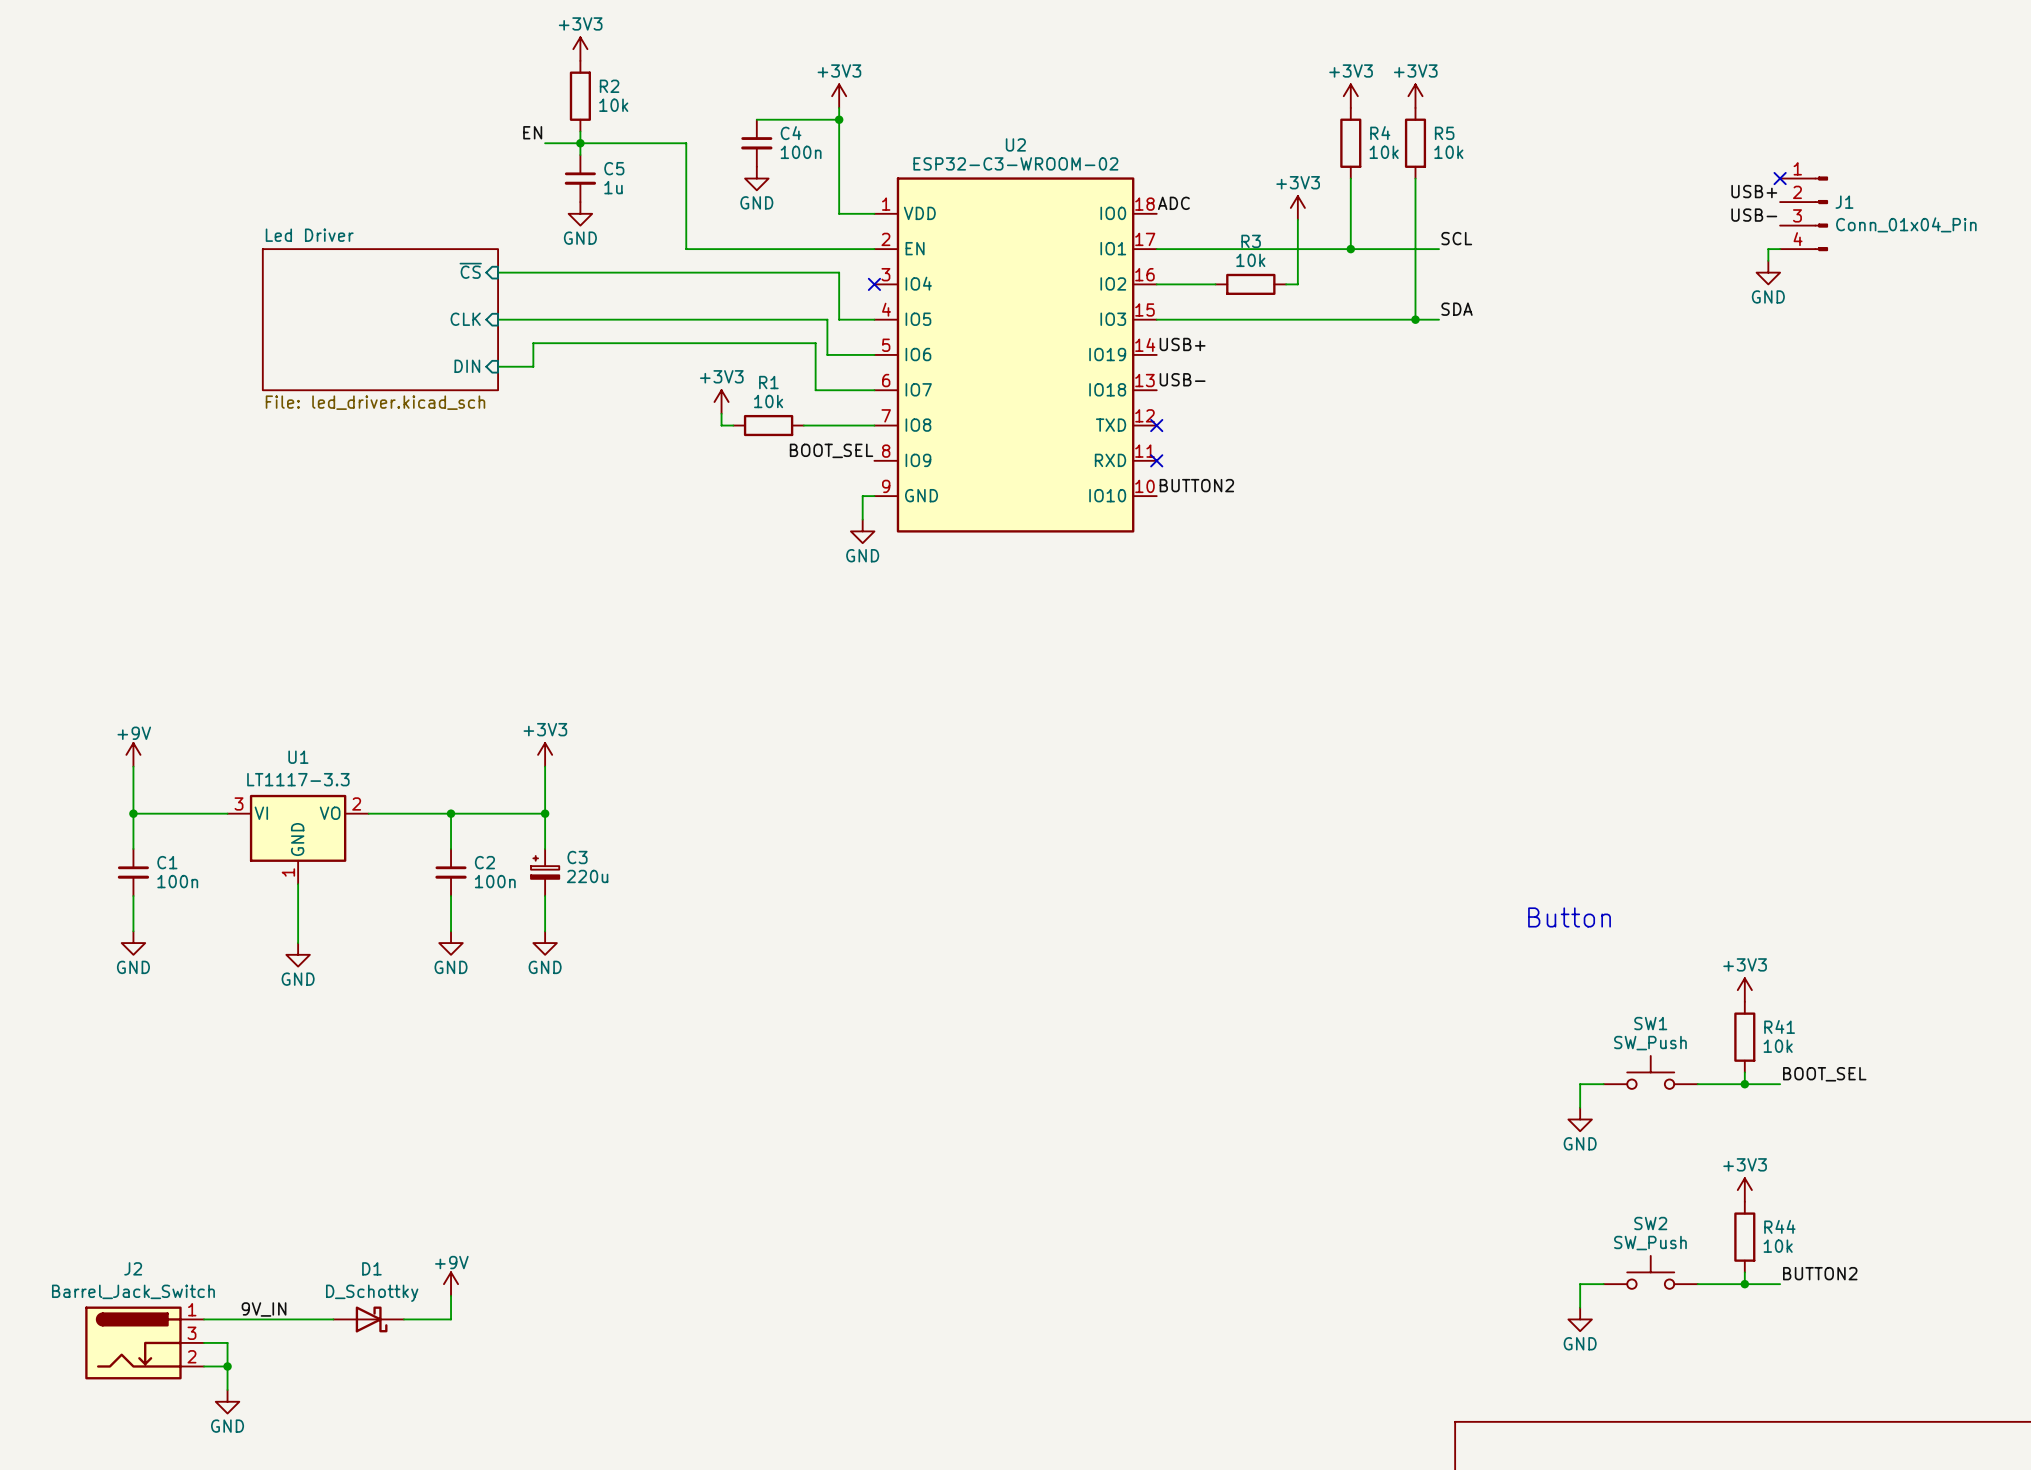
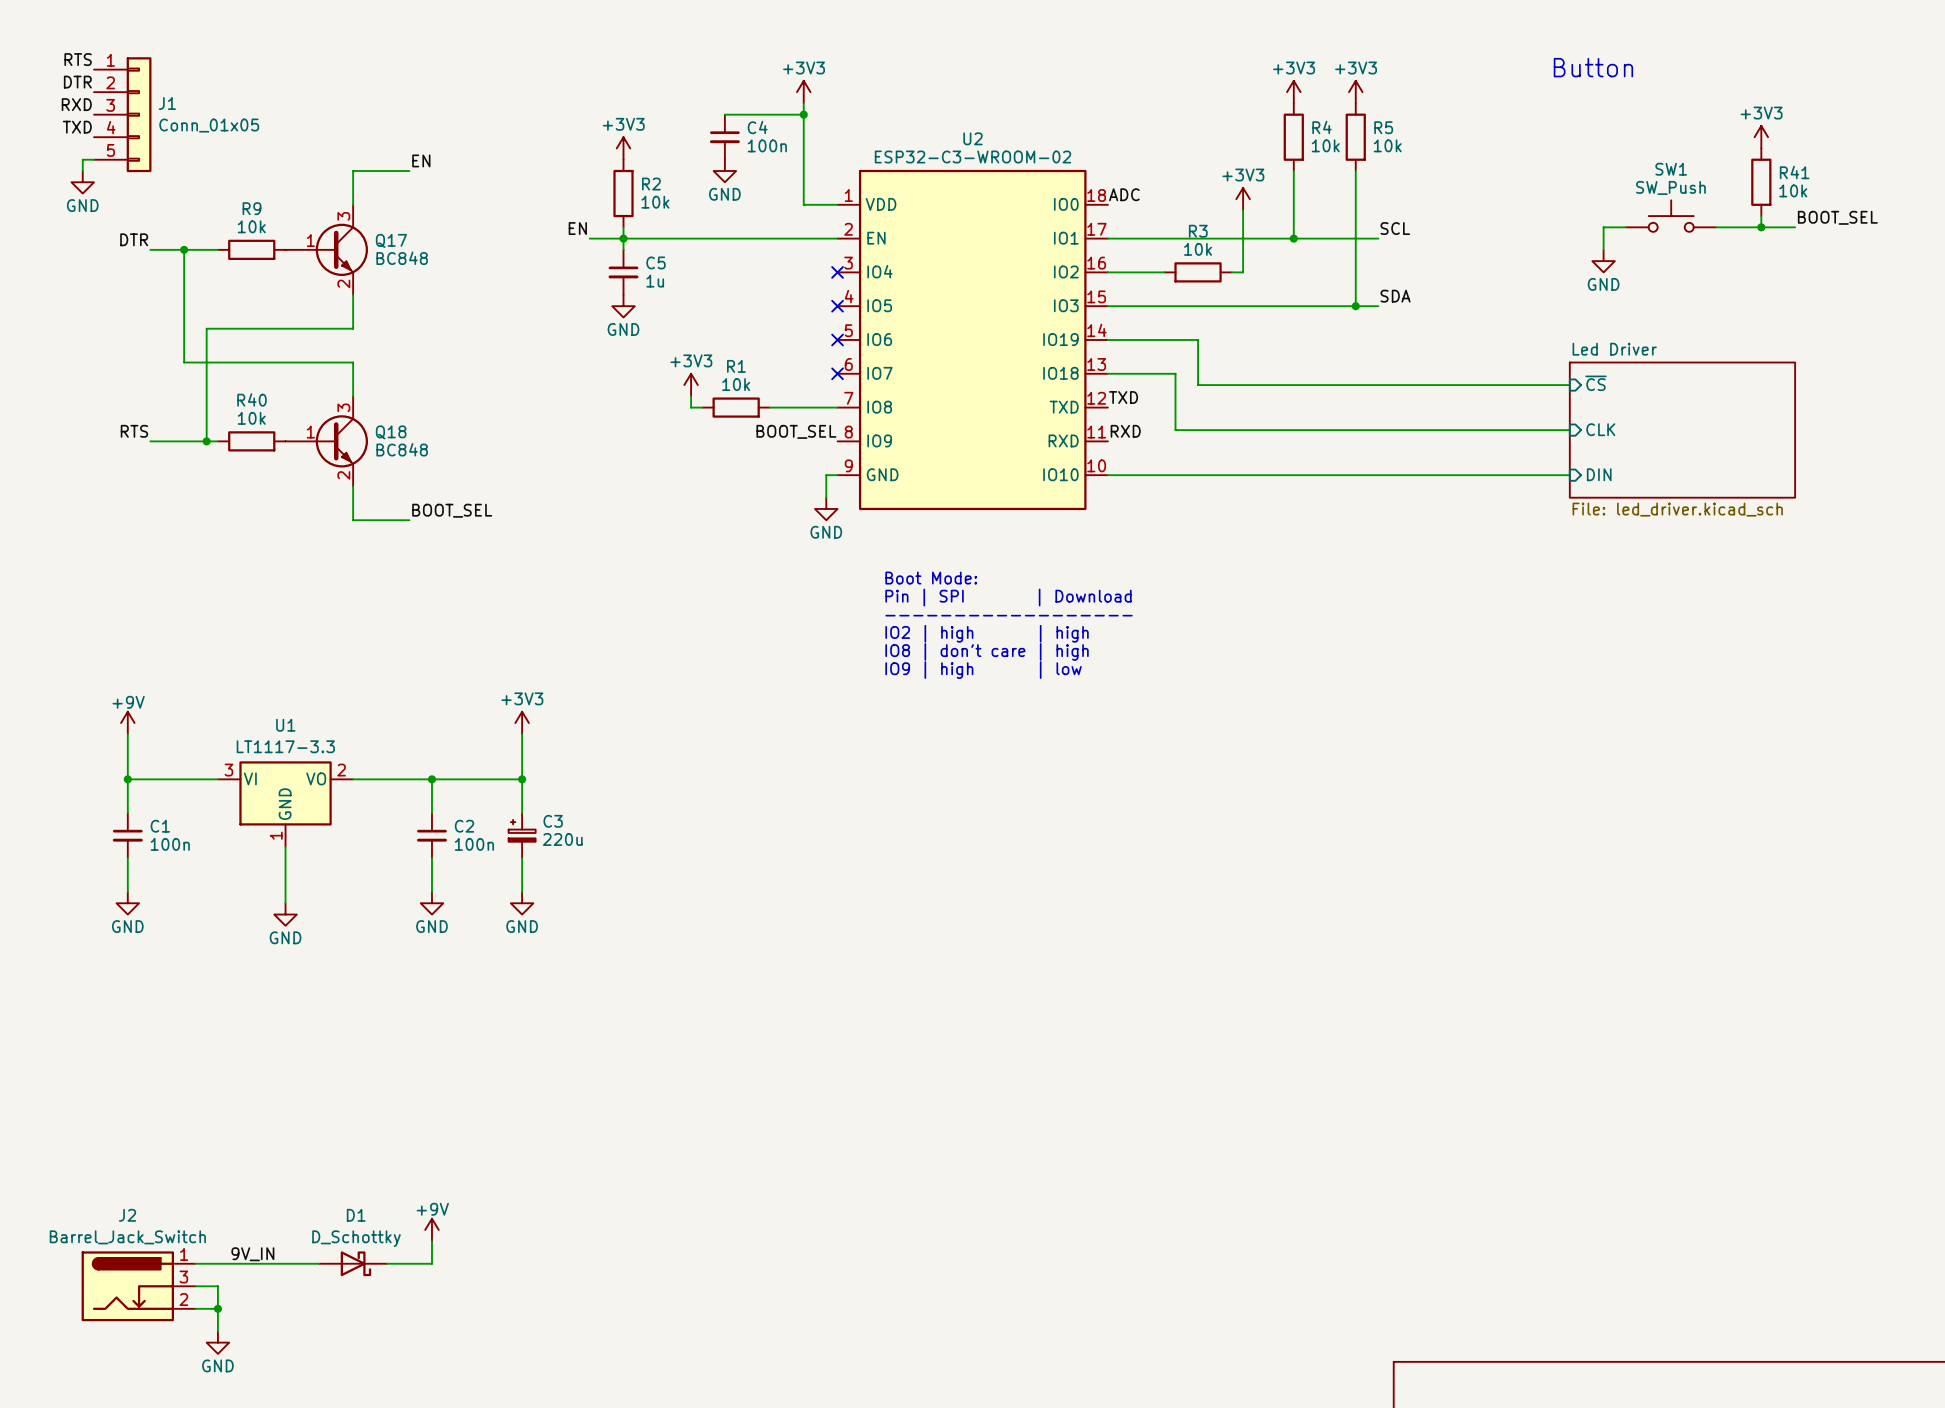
power symbol position: +3V3 (580, 49) -> +3V3 (623, 148)
label: none -> RTS (78, 59)
text: none -> Button (1593, 67)
label: none -> DTR (77, 82)
R2 position: (580, 96) -> (623, 193)
label: none -> RXD (76, 104)
wire: (580, 131) (580, 155) -> (623, 227) (623, 249)
label: none -> TXD (77, 127)
label: EN (532, 132) -> none
wire: (545, 143) (686, 143) (686, 249) -> (589, 238) (657, 238)
junction: (580, 143) -> none
power symbol: none -> +3V3 (1761, 137)
wire: none -> (94, 159) (82, 159) (82, 171)
label: none -> EN (421, 160)
J1 symbol: [1780, 176, 1828, 251] -> [94, 57, 152, 173]
wire: none -> (409, 171) (353, 171) (353, 204)
C5 position: (580, 178) -> (623, 272)
no-connect mark: (1780, 178) -> none
power symbol: none -> GND (82, 182)
label: USB+ (1754, 191) -> none
power symbol position: GND (580, 213) -> GND (623, 306)
label: USB- (1754, 215) -> none
J1 value: Conn_01x04_Pin (1906, 224) -> Conn_01x05 (209, 125)
wire: none -> (1761, 216) (1761, 227)
label: none -> BOOT_SEL (1837, 217)
wire: none -> (1626, 227) (1603, 227) (1603, 249)
wire: none -> (1716, 227) (1795, 227)
junction: none -> (1761, 227)
label: none -> EN (577, 228)
junction: none -> (623, 238)
wire: (1780, 249) (1768, 249) (1768, 260) -> none
label: none -> DTR (134, 239)
wire: none -> (150, 249) (217, 249)
wire: none -> (184, 249) (184, 362) (353, 362) (353, 396)
junction: none -> (184, 249)
R9: none -> 10k (251, 249)
Q17: none -> BC848 (326, 249)
sheet pin: ~{CS} (470, 270) -> none
wire: (498, 272) (839, 272) (839, 319) (874, 319) -> none
power symbol position: GND (1768, 272) -> GND (1603, 261)
wire: none -> (353, 294) (353, 328) (206, 328) (206, 441)
sheet Led Driver: File: led_driver.kicad_sch (380, 319) -> none
sheet pin: CLK (465, 319) -> none
wire: (498, 319) (827, 319) (827, 354) (874, 354) -> none
no-connect mark: none -> (837, 306)
label: USB+ (1182, 344) -> none
no-connect mark: none -> (837, 339)
wire: none -> (1107, 339) (1198, 339) (1198, 385) (1569, 385)
sheet pin: DIN (467, 366) -> none
wire: (498, 366) (533, 366) (533, 343) (815, 343) (815, 390) (874, 390) -> none
label: USB- (1182, 379) -> none
no-connect mark: none -> (837, 373)
wire: none -> (1107, 373) (1175, 373) (1175, 430) (1569, 430)
sheet pin: none -> ~{CS} (1596, 383)
label: none -> TXD (1123, 397)
no-connect mark: (1156, 425) -> none
sheet pin: none -> CLK (1600, 429)
sheet Led Driver: none -> File: led_driver.kicad_sch (1682, 430)
label: none -> RTS (134, 431)
label: none -> RXD (1125, 431)
wire: none -> (150, 441) (217, 441)
junction: none -> (206, 441)
R40: none -> 10k (251, 441)
Q18: none -> BC848 (326, 441)
no-connect mark: (1156, 460) -> none
label: BUTTON2 (1196, 485) -> none
sheet pin: none -> DIN (1599, 474)
wire: none -> (1107, 475) (1569, 475)
wire: none -> (353, 486) (353, 520) (409, 520)
label: none -> BOOT_SEL (452, 510)
text: none -> Boot Mode: (931, 578)
text: none -> Pin | SPI | Download (1008, 597)
text: none -> ------------------ (1009, 615)
text: none -> IO2 | high | high (987, 633)
text: none -> IO8 | don't care | high (987, 651)
text: none -> IO9 | high | low (983, 670)
text: Button (1569, 917) -> none
power symbol: +3V3 (1744, 990) -> none
R41 position: (1744, 1037) -> (1761, 182)
SW1 position: (1650, 1072) -> (1671, 216)
wire: (1744, 1072) (1744, 1084) -> none
label: BOOT_SEL (1824, 1074) -> none
wire: (1603, 1084) (1580, 1084) (1580, 1107) -> none
wire: (1697, 1084) (1780, 1084) -> none
junction: (1744, 1084) -> none
power symbol: GND (1580, 1119) -> none
power symbol: +3V3 (1744, 1190) -> none
R44: 10k (1744, 1237) -> none
SW2: SW_Push (1650, 1272) -> none
wire: (1744, 1272) (1744, 1284) -> none
label: BUTTON2 (1820, 1273) -> none
wire: (1603, 1284) (1580, 1284) (1580, 1307) -> none
wire: (1697, 1284) (1780, 1284) -> none
junction: (1744, 1284) -> none
power symbol: GND (1580, 1319) -> none

